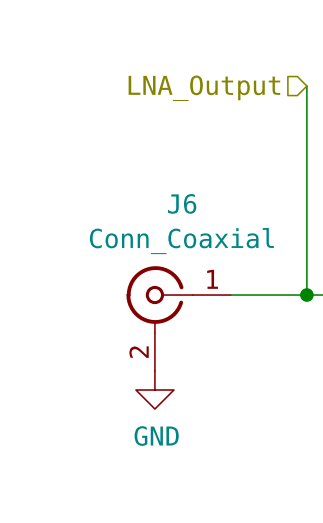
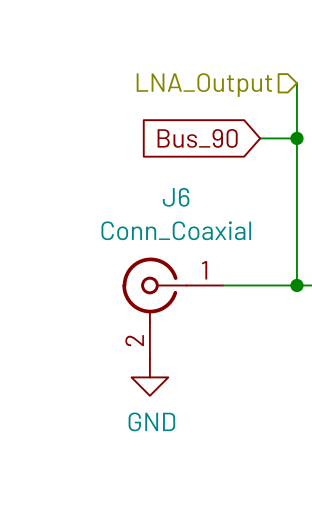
wire: none -> (260, 138) (296, 138)
junction: none -> (296, 138)
global label: none -> Bus_90 (197, 138)

